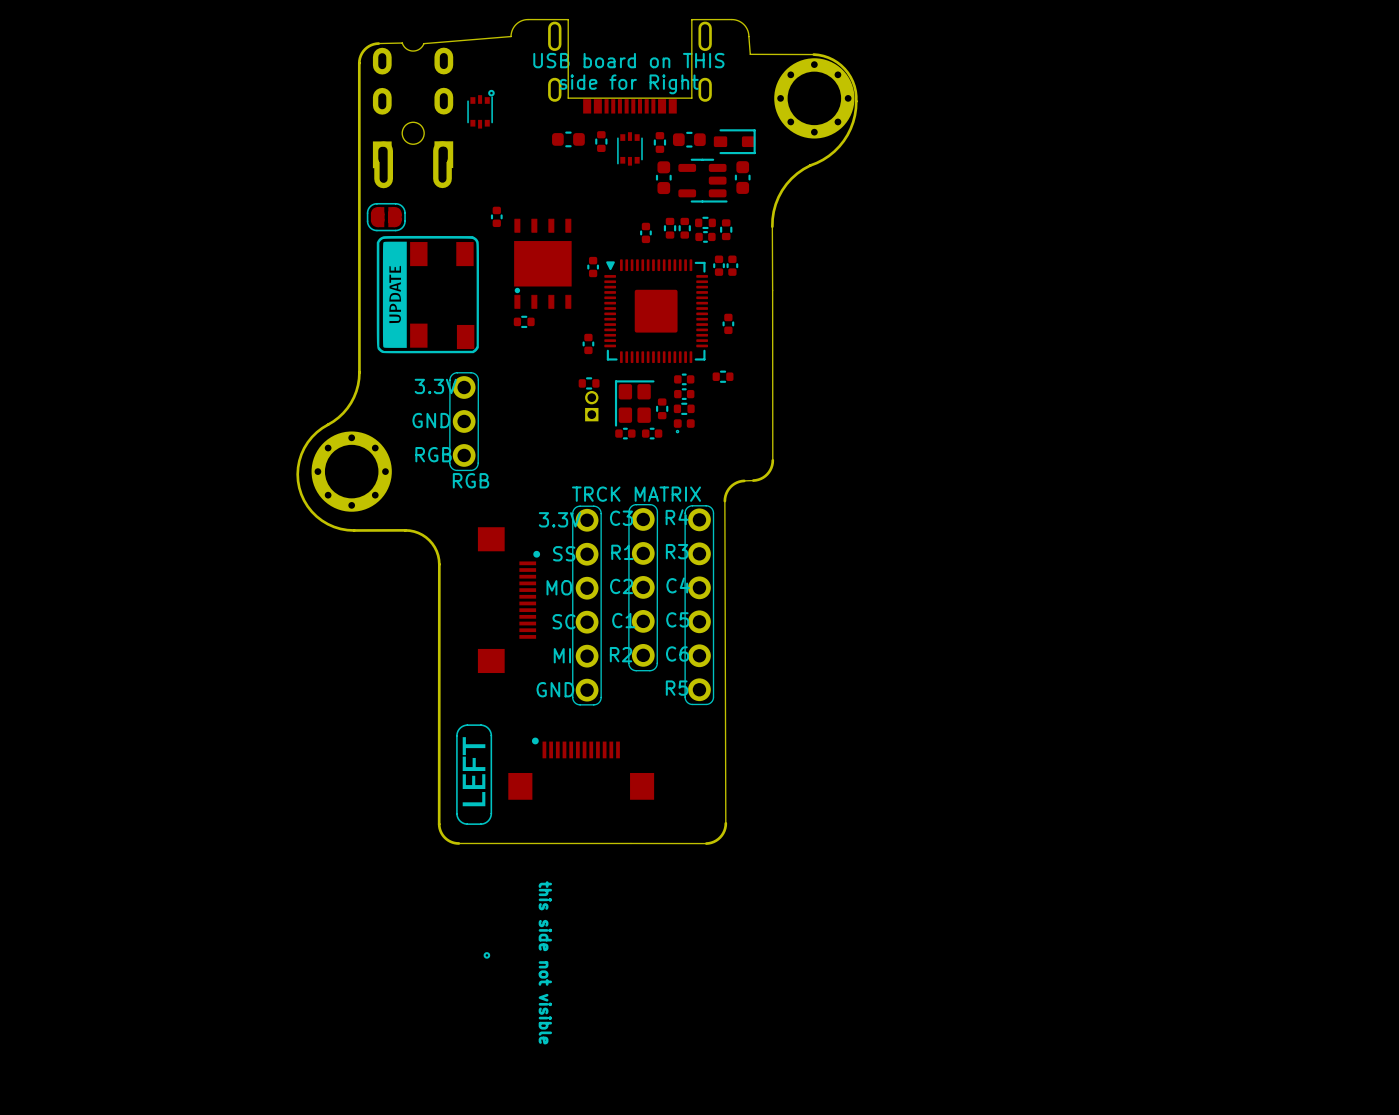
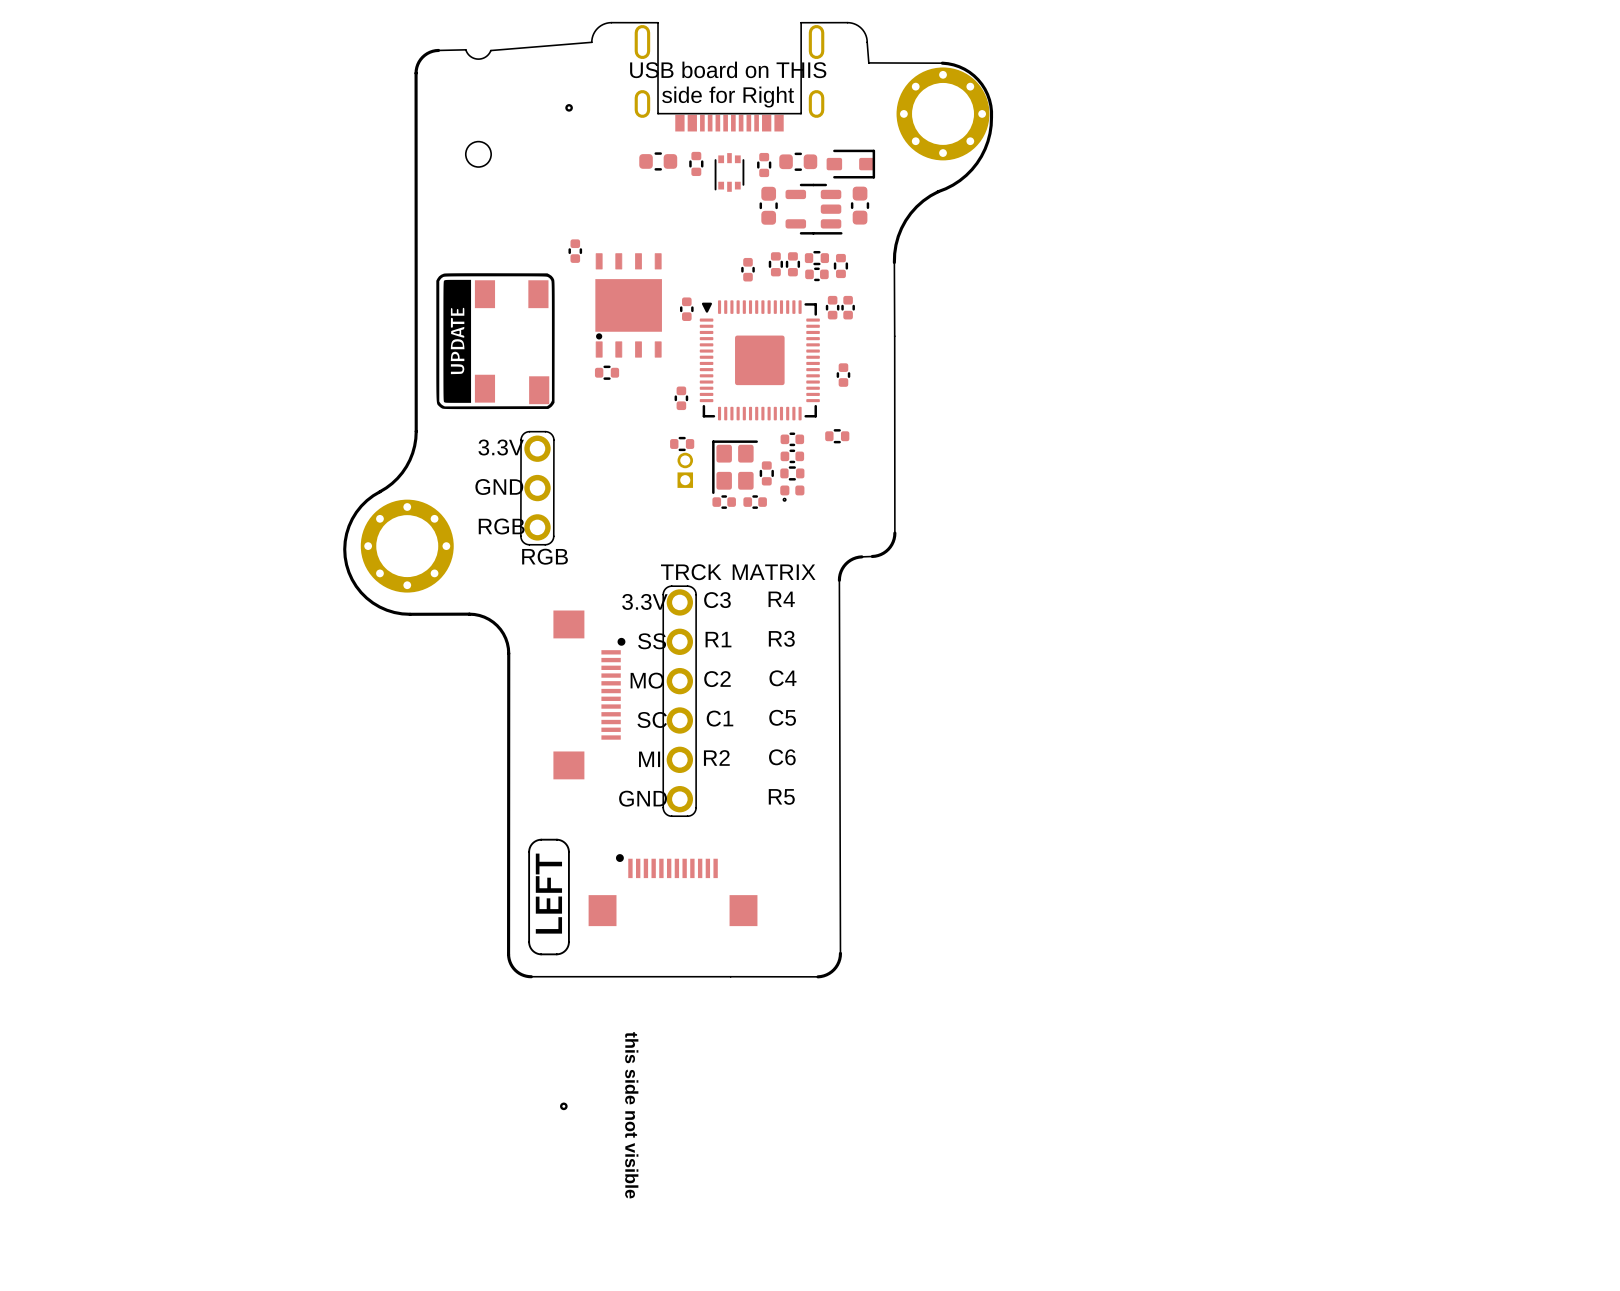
part: (480, 111) -> none
part: (443, 117) -> none
part: (382, 118) -> none
part: (386, 217) -> none
part: (643, 587) -> none
part: (699, 605) -> none

